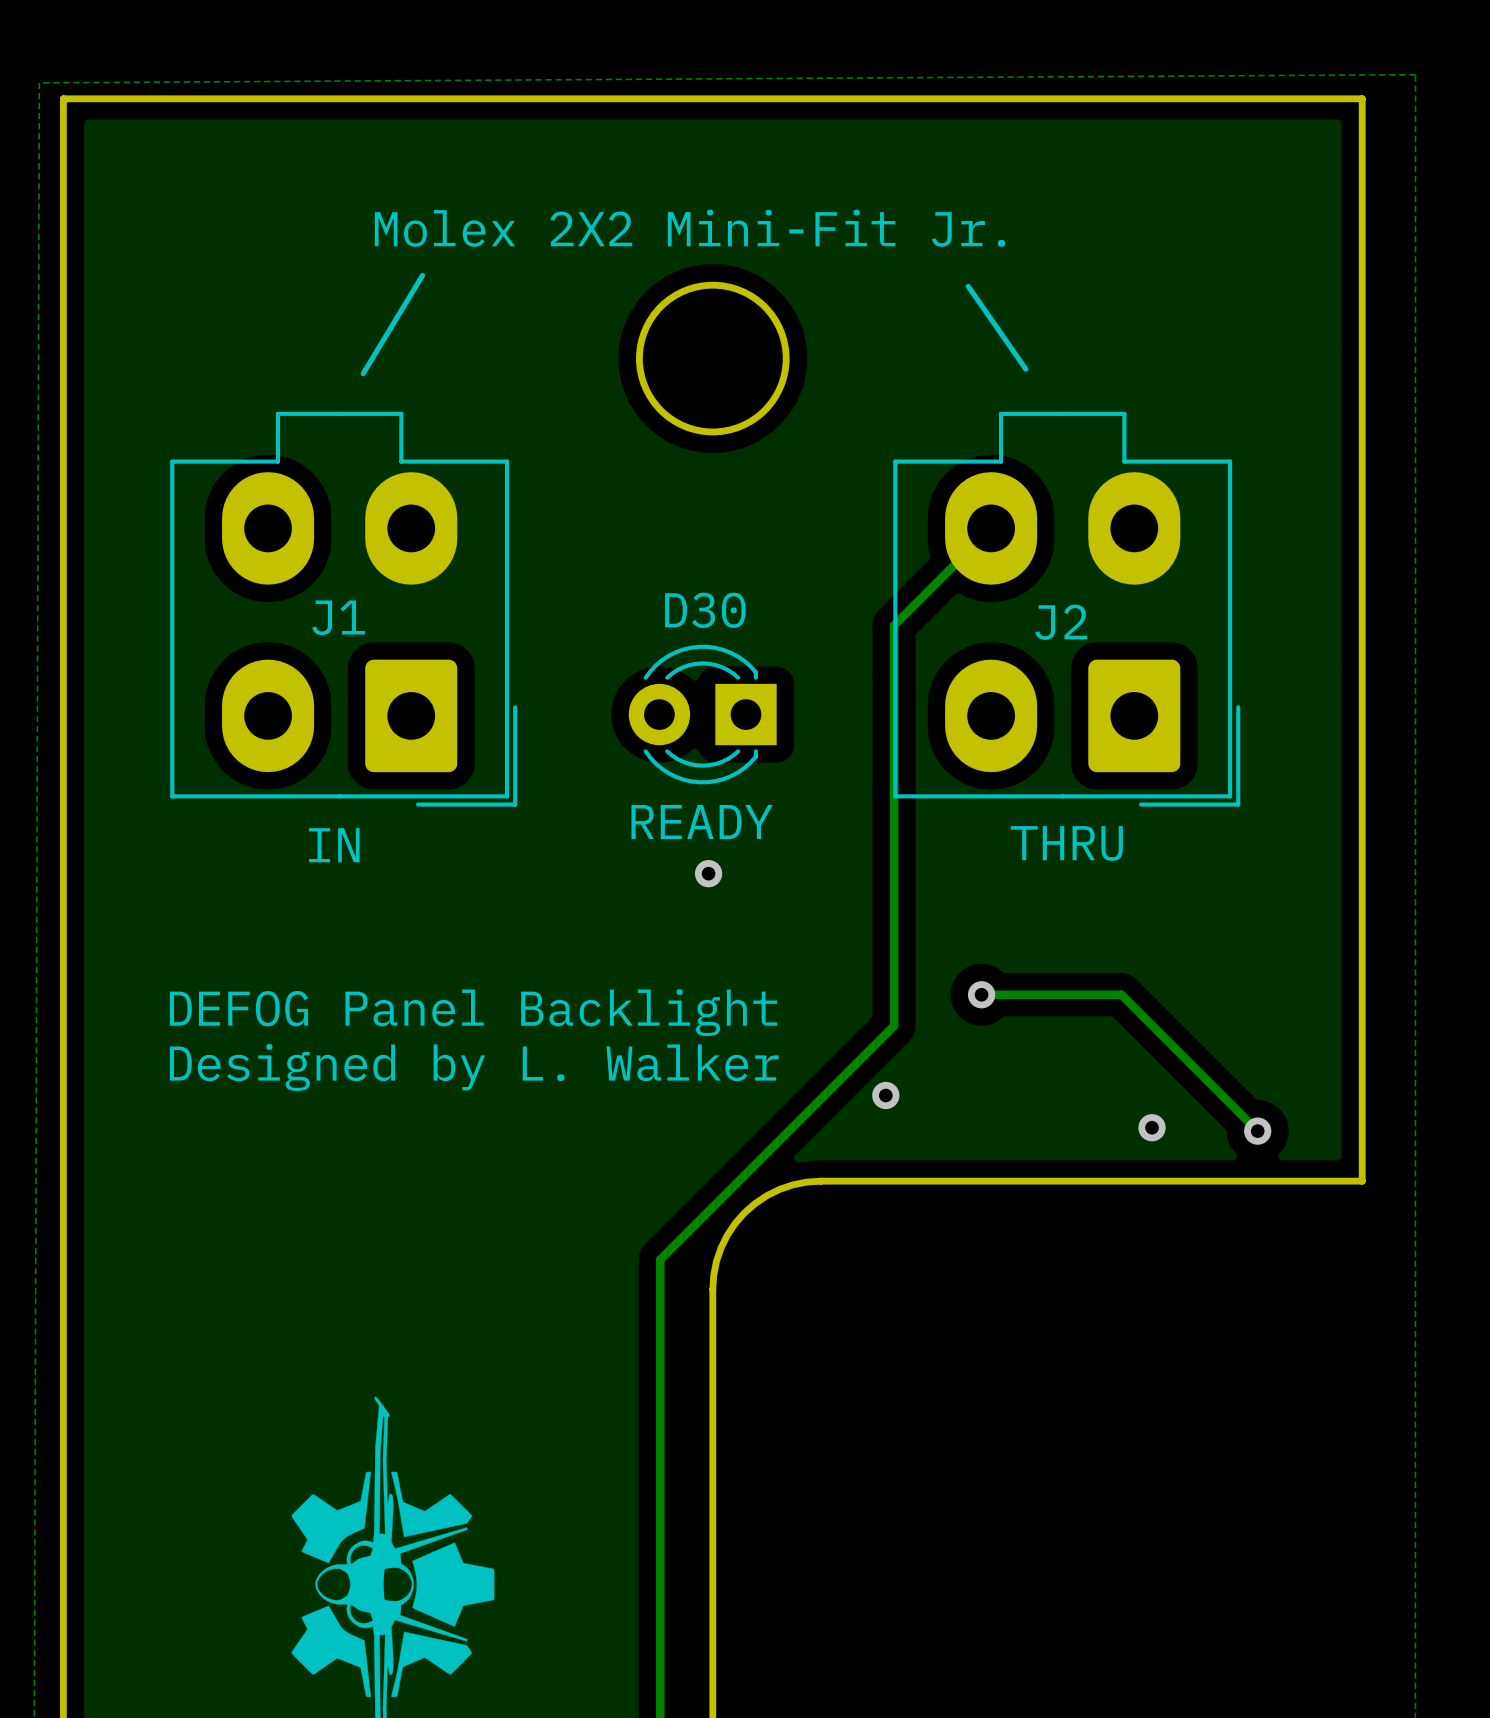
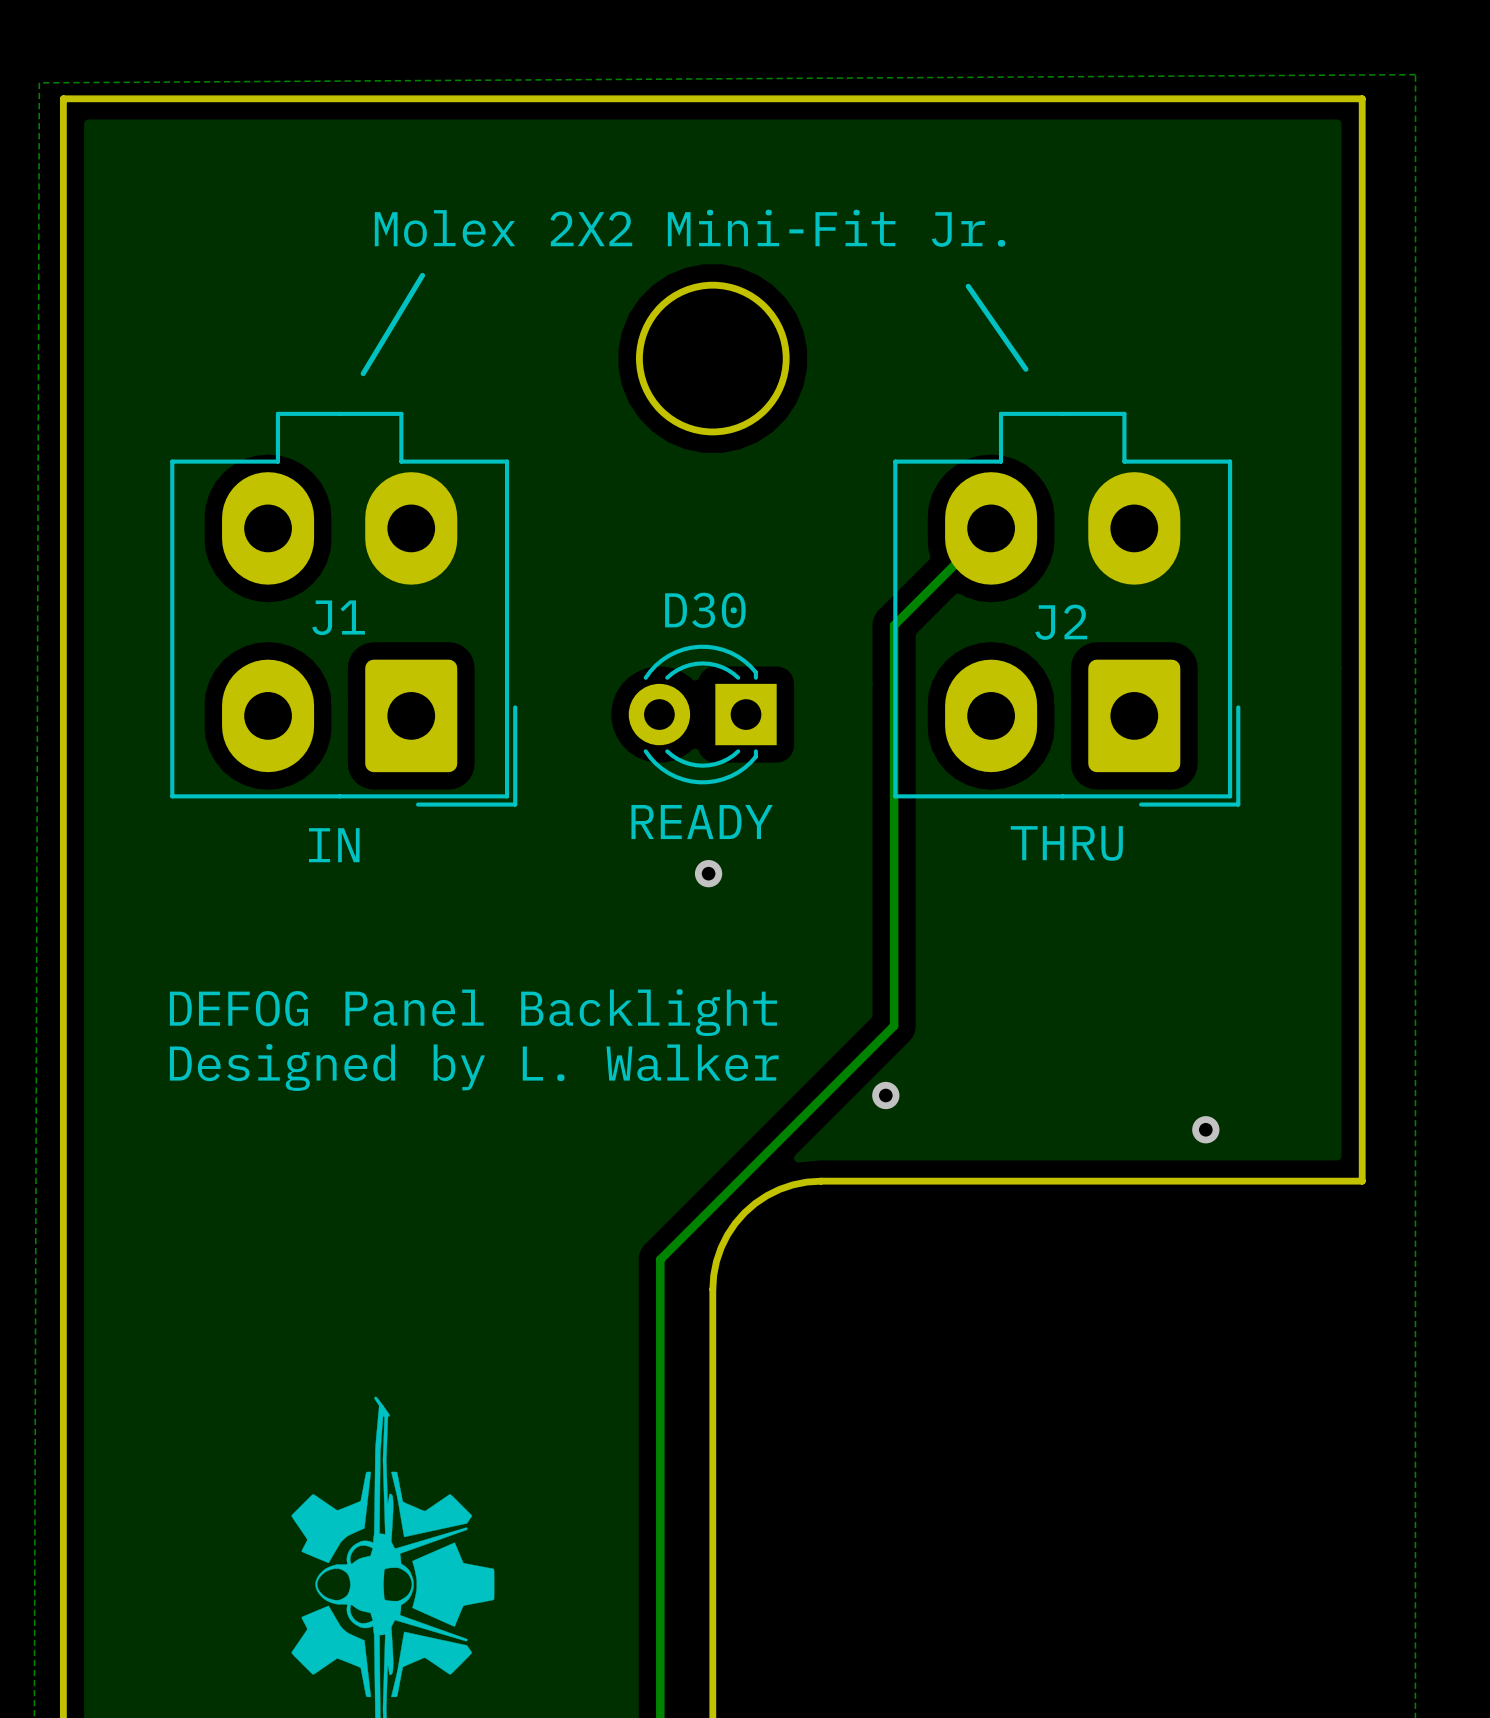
track: (981, 994) (1121, 994) (1257, 1131) -> none
via: (981, 994) -> none
via: (1152, 1127) -> none
via: none -> (1205, 1129)
via: (1257, 1131) -> none

